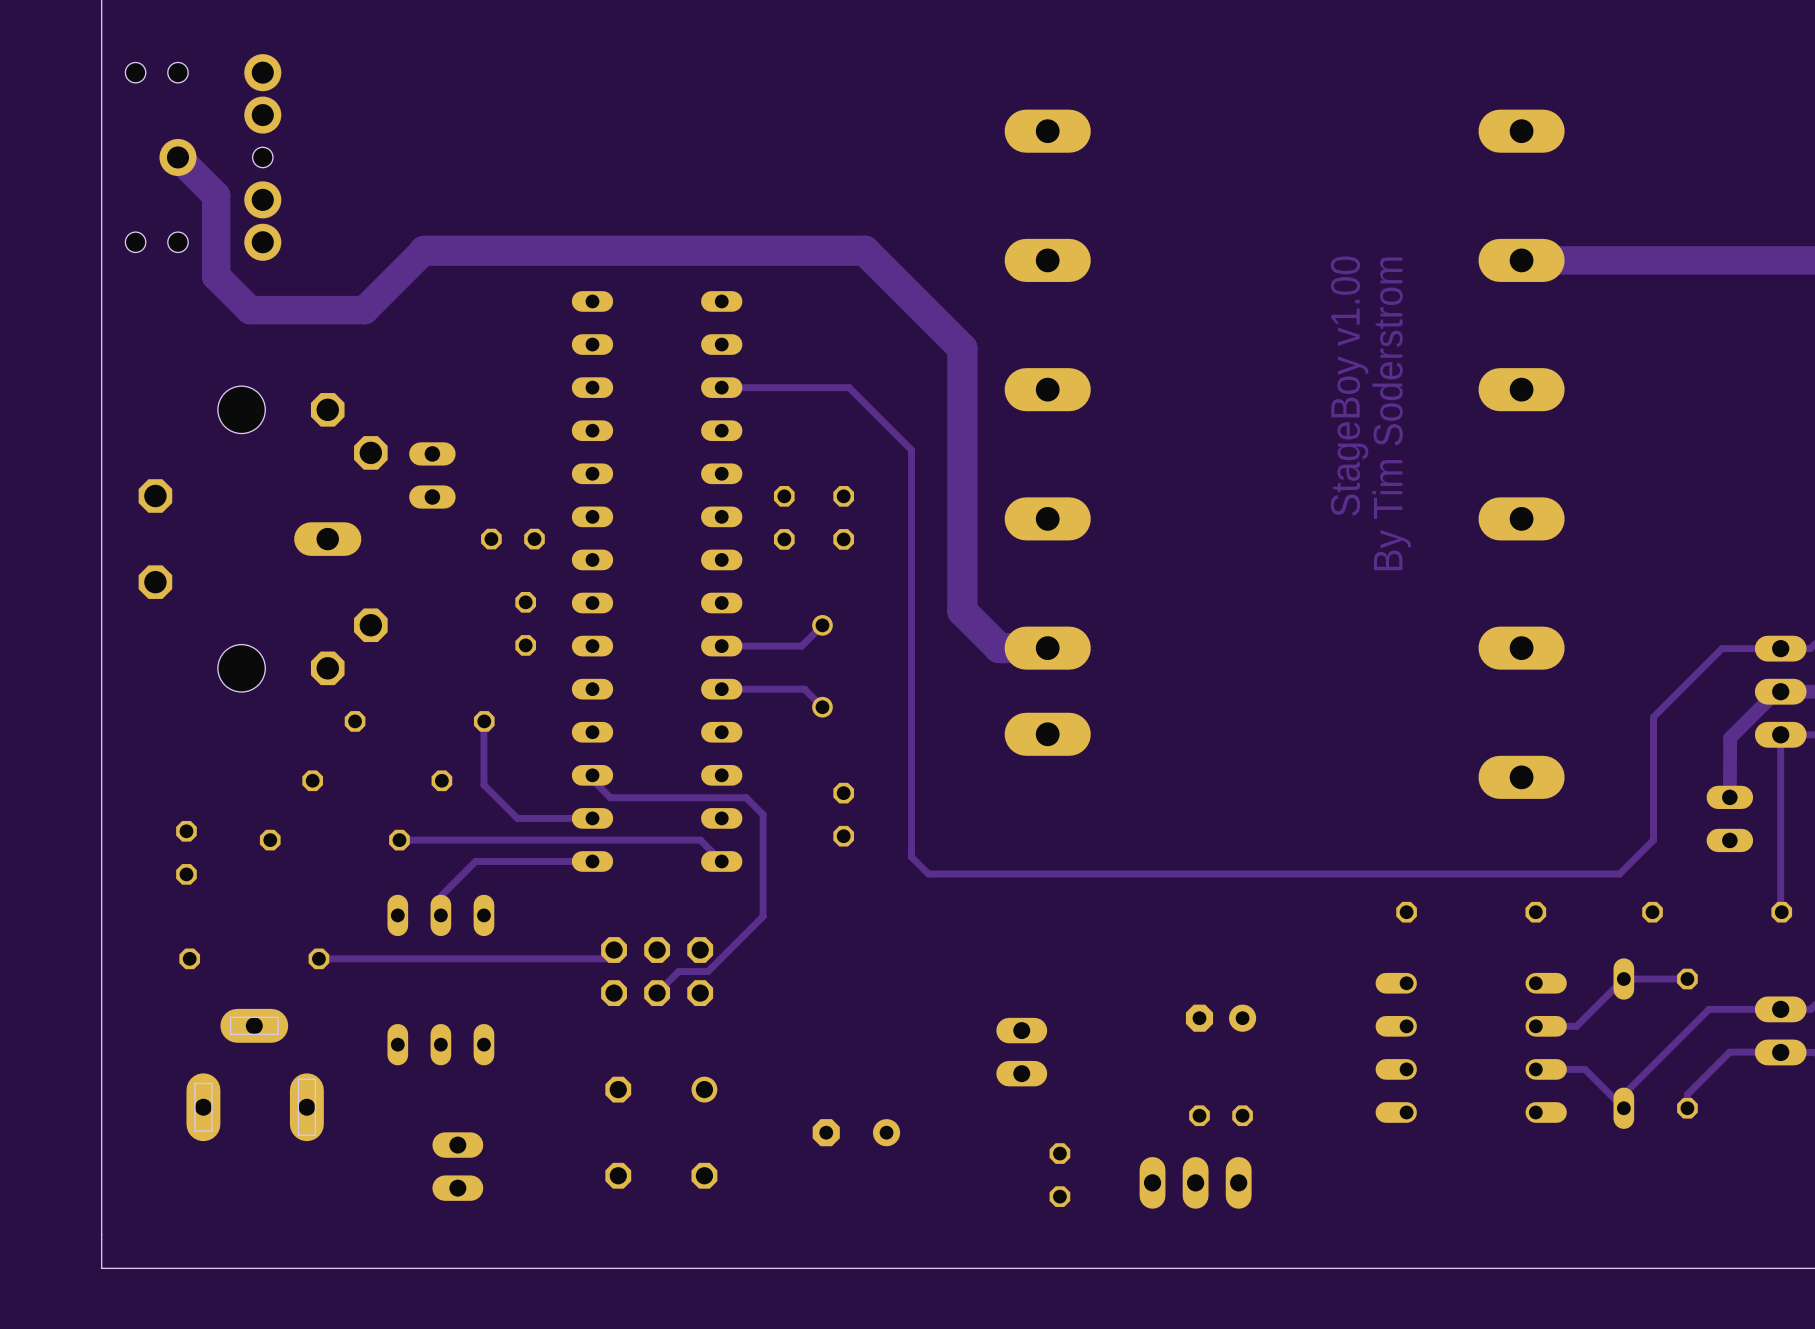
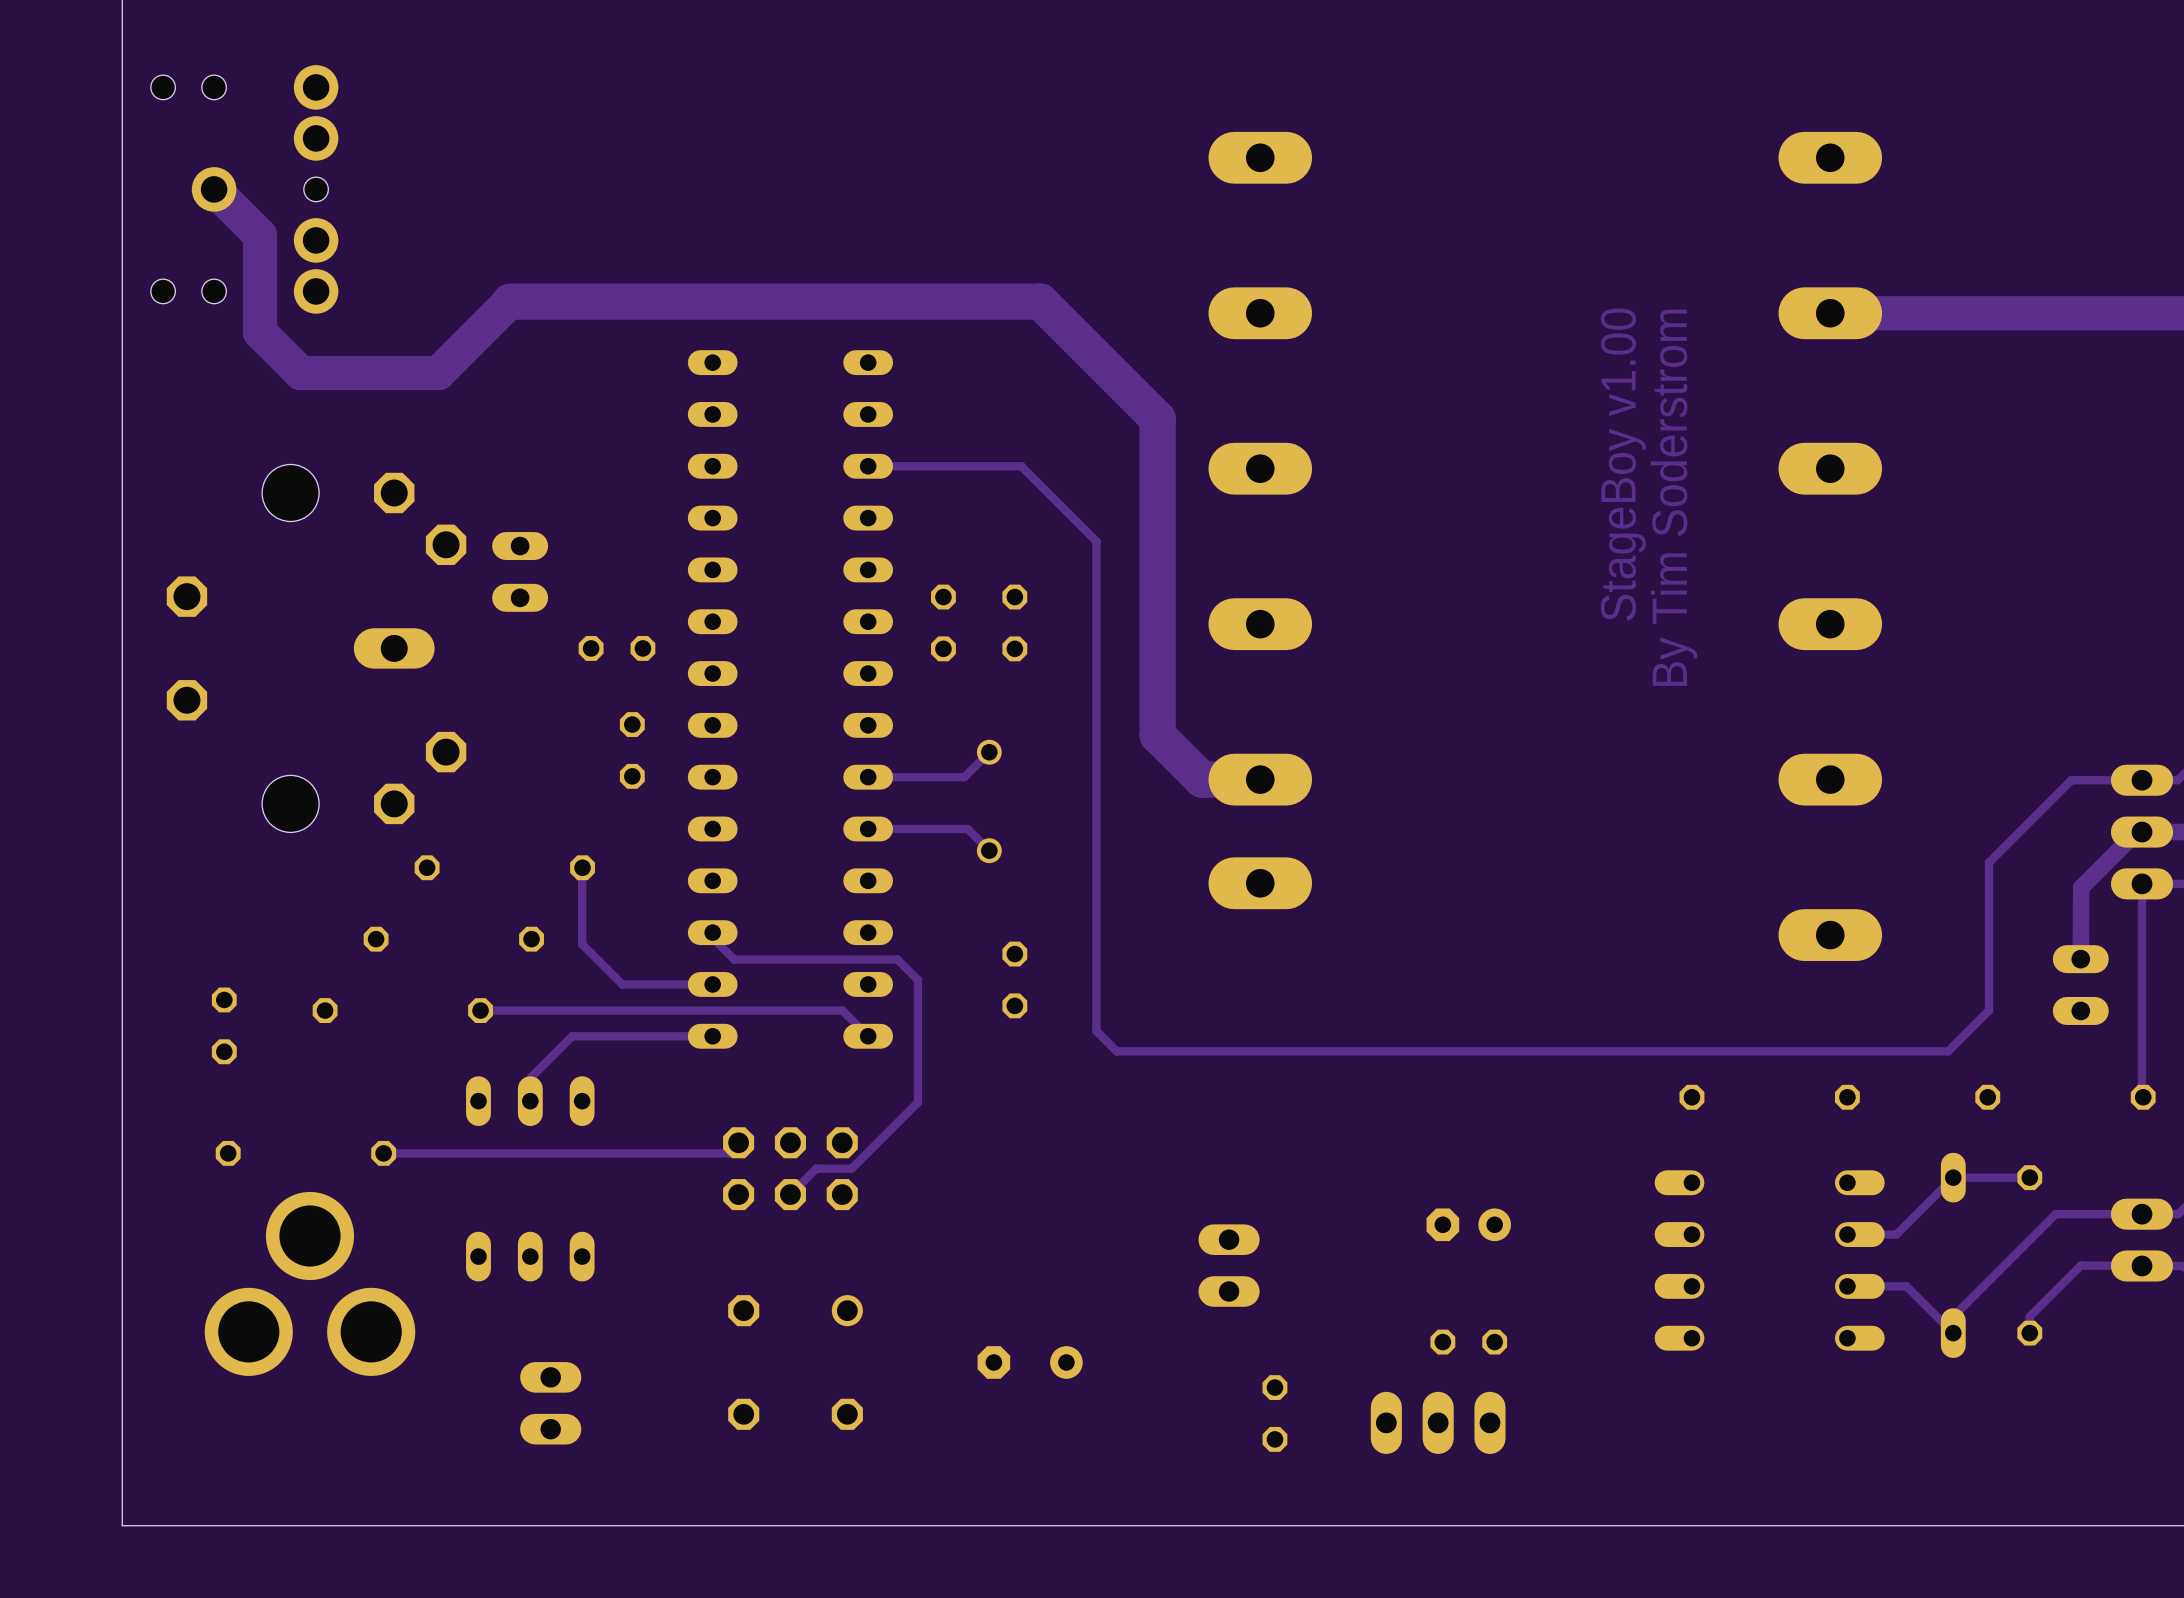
part footprint: [186, 1008, 324, 1142] -> [204, 1191, 416, 1376]

